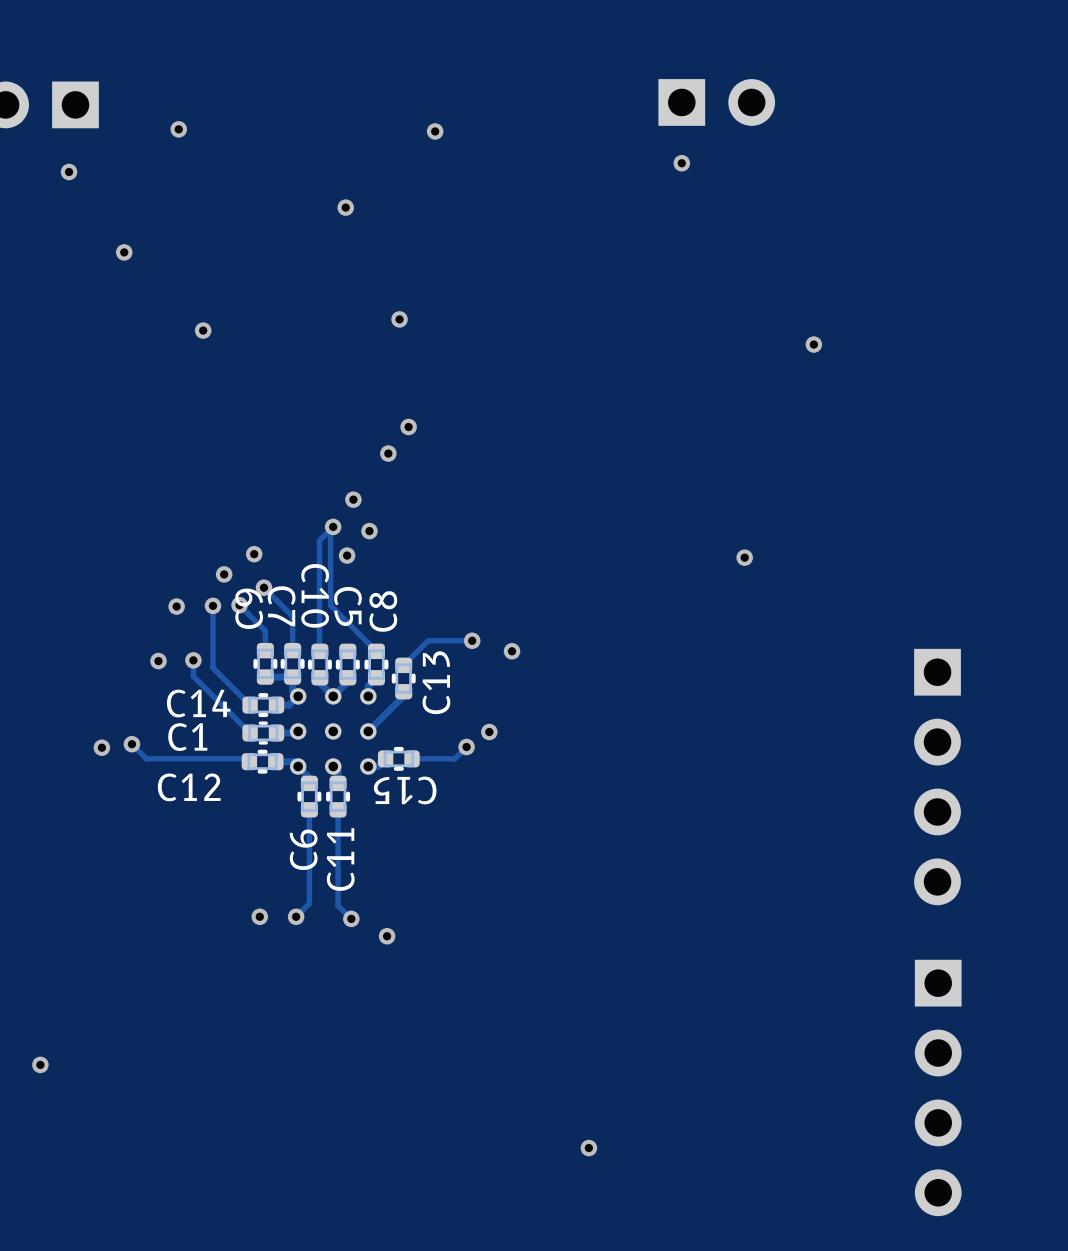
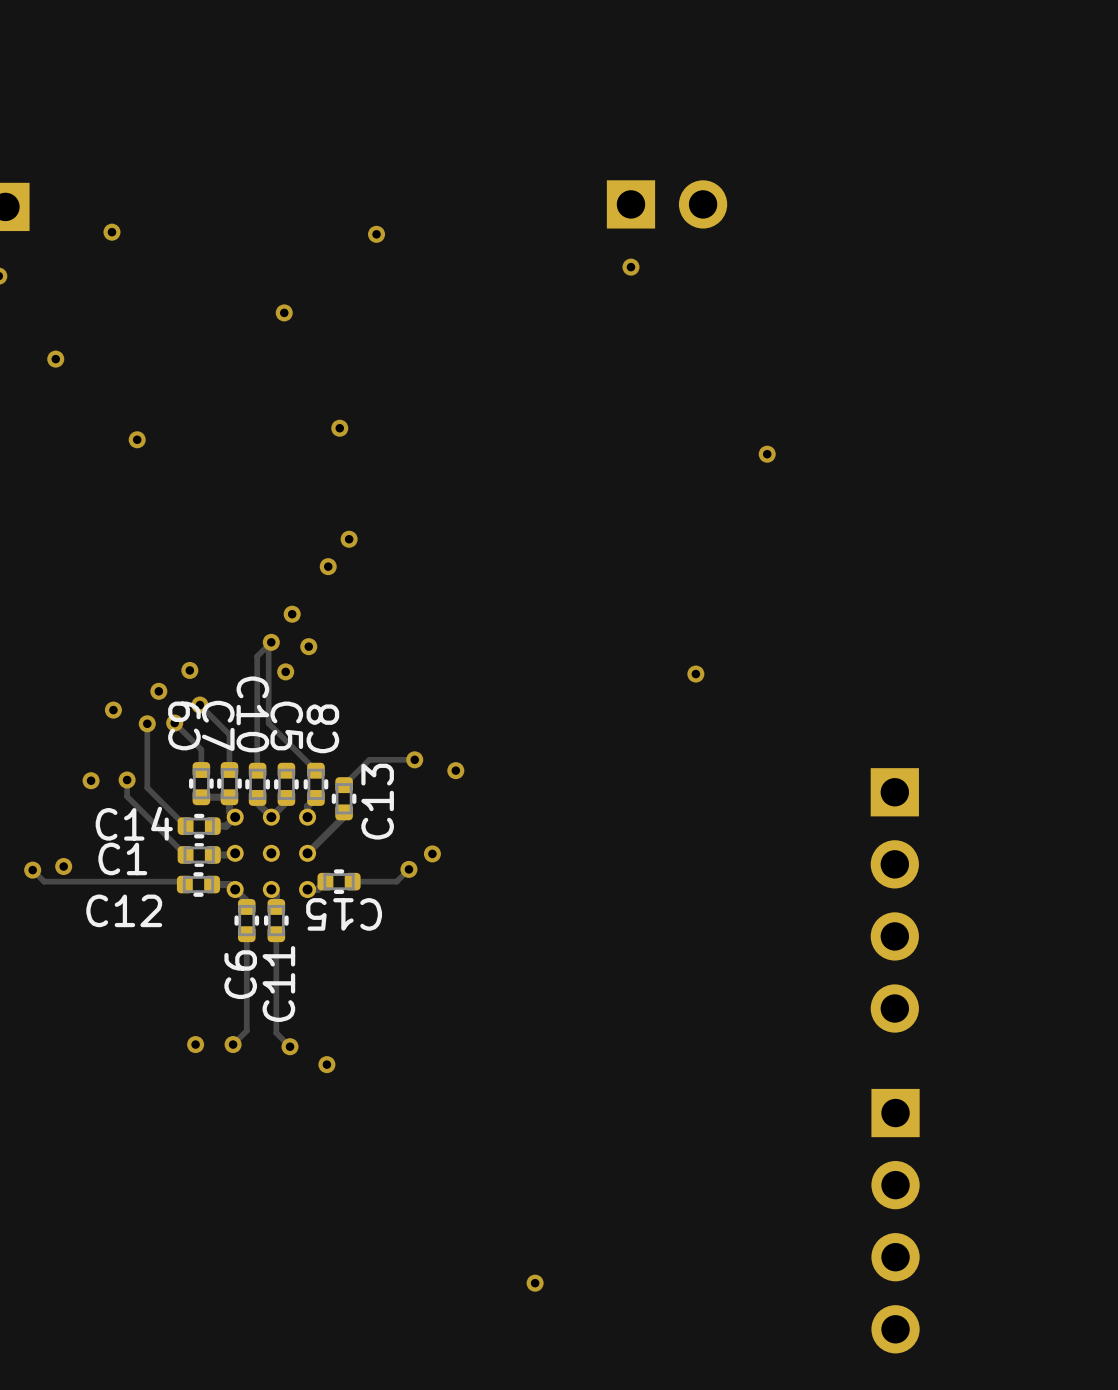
via position: (176, 606) -> (113, 710)
track: (131, 744) (146, 758) -> (31, 869) (44, 881) (78, 881)

